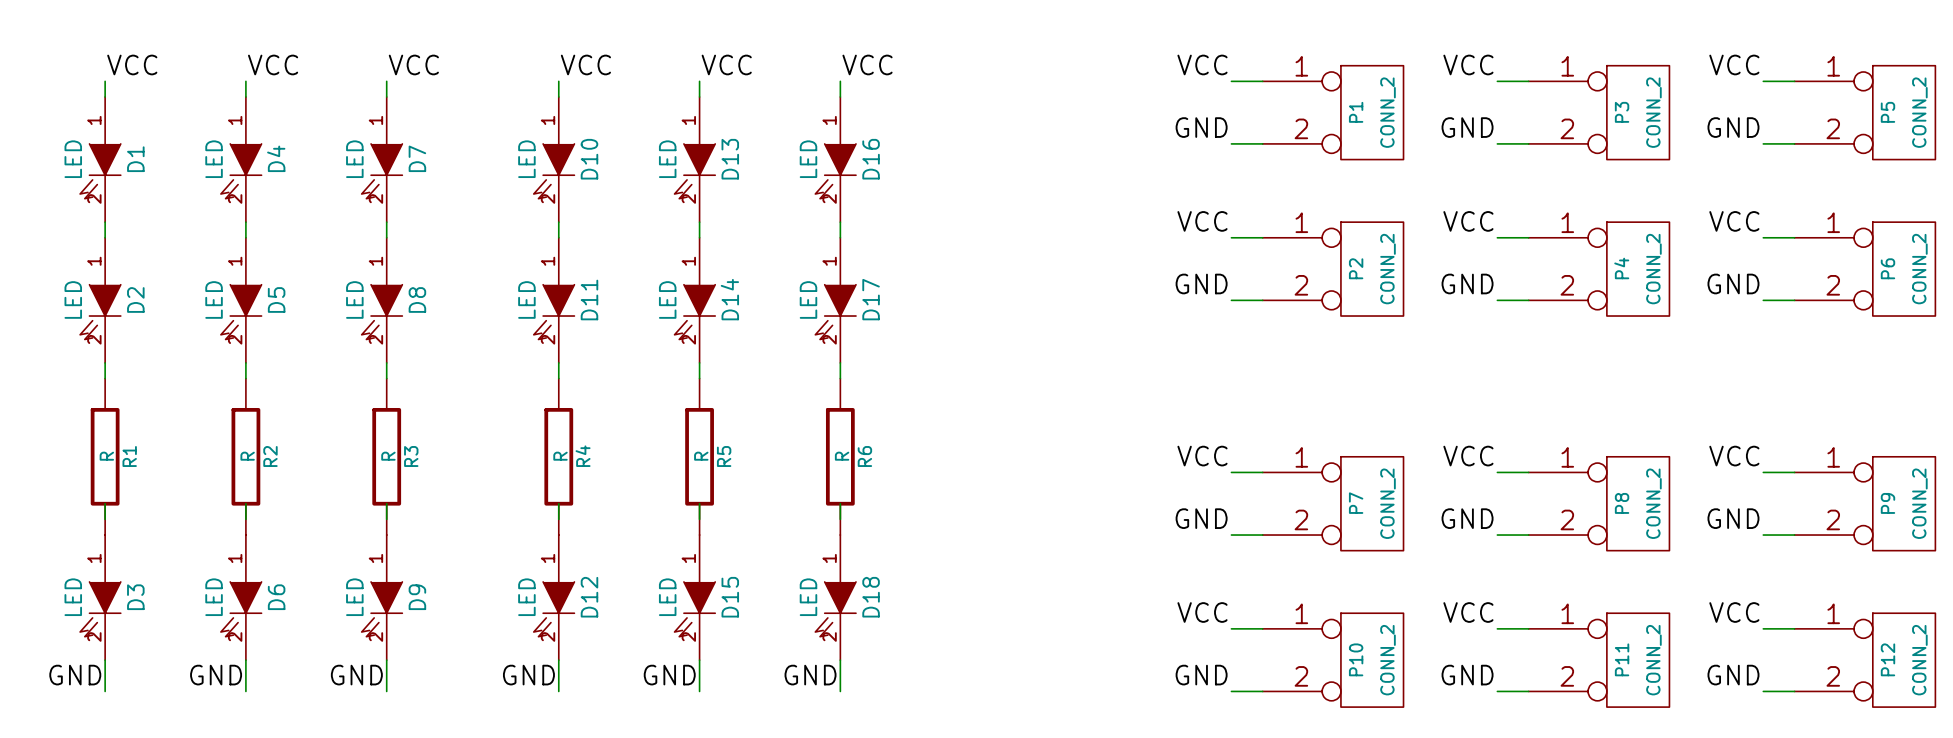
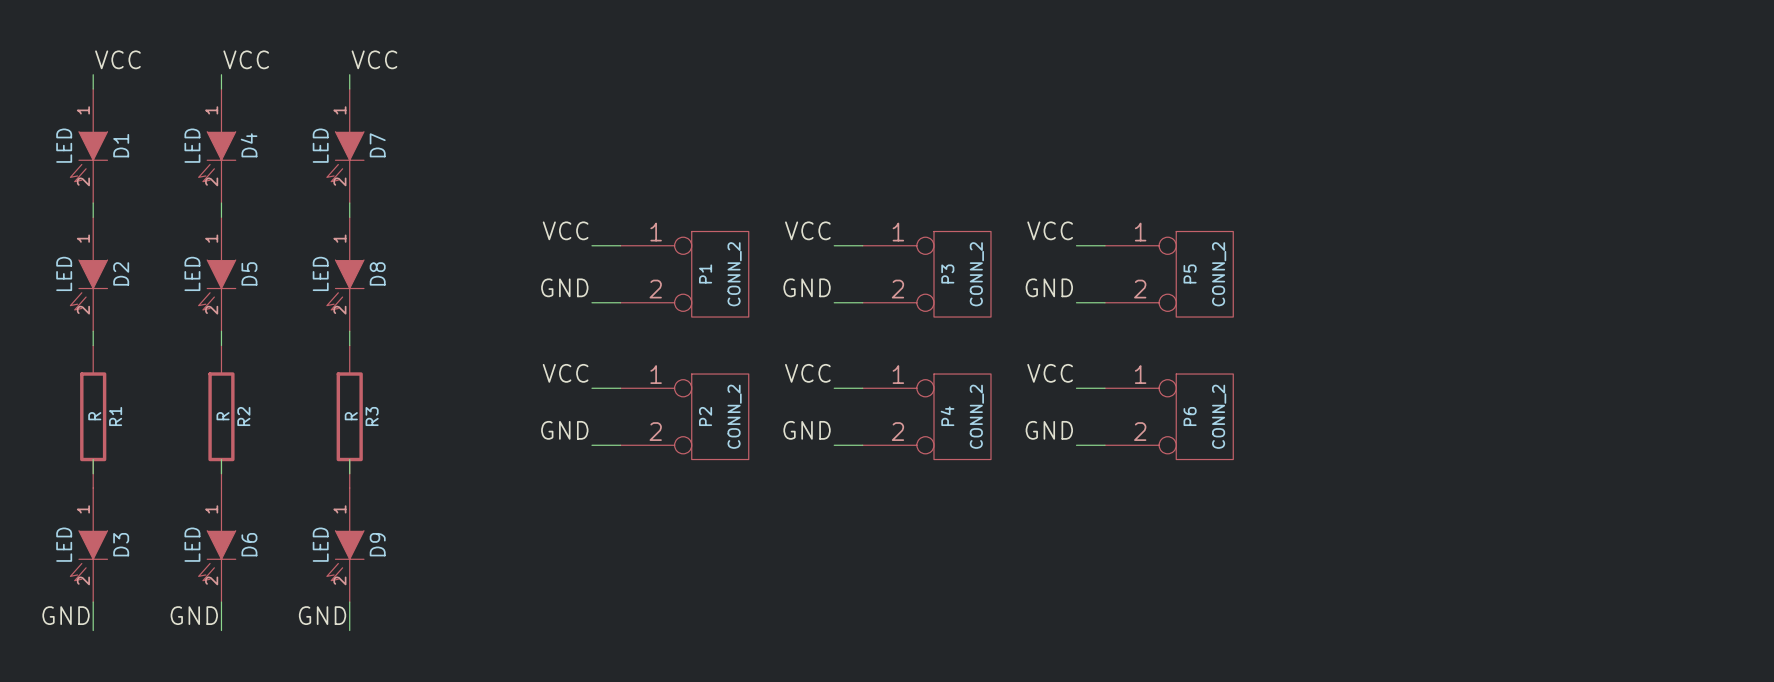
label: VCC (585, 64) -> none
label: VCC (726, 64) -> none
label: VCC (867, 64) -> none
label: VCC (1202, 64) -> none
label: VCC (1468, 64) -> none
label: VCC (1734, 64) -> none
wire: (558, 81) (558, 97) -> none
wire: (699, 81) (699, 97) -> none
wire: (840, 81) (840, 97) -> none
wire: (1231, 81) (1262, 81) -> (1076, 245) (1105, 245)
wire: (1497, 81) (1528, 81) -> none
wire: (1763, 81) (1794, 81) -> none
P1 position: (1333, 112) -> (684, 274)
P3 position: (1599, 112) -> (926, 274)
P5 position: (1864, 112) -> (1169, 274)
label: GND (1201, 127) -> none
label: GND (1467, 127) -> none
label: GND (1733, 127) -> none
wire: (1231, 143) (1262, 143) -> (1076, 302) (1105, 302)
wire: (1497, 143) (1528, 143) -> none
wire: (1763, 143) (1794, 143) -> none
D10: LED (554, 159) -> none
D13: LED (694, 159) -> none
D16: LED (835, 159) -> none
label position: VCC (1202, 221) -> VCC (1050, 230)
label: VCC (1468, 221) -> none
label: VCC (1734, 221) -> none
wire: (558, 222) (558, 237) -> none
wire: (699, 222) (699, 237) -> none
wire: (840, 222) (840, 237) -> none
wire: (1231, 237) (1262, 237) -> (1076, 388) (1105, 388)
wire: (1497, 237) (1528, 237) -> none
wire: (1763, 237) (1794, 237) -> none
label: none -> VCC (565, 230)
label: none -> VCC (807, 230)
wire: none -> (591, 245) (620, 245)
wire: none -> (834, 245) (862, 245)
P2 position: (1333, 269) -> (684, 416)
P4 position: (1599, 269) -> (926, 416)
P6 position: (1864, 269) -> (1169, 416)
label position: GND (1201, 283) -> GND (1049, 287)
label: GND (1467, 283) -> none
label: GND (1733, 283) -> none
D11: LED (554, 300) -> none
D14: LED (694, 300) -> none
D17: LED (835, 300) -> none
wire: (1231, 300) (1262, 300) -> (1076, 445) (1105, 445)
wire: (1497, 300) (1528, 300) -> none
wire: (1763, 300) (1794, 300) -> none
label: none -> GND (564, 287)
label: none -> GND (807, 287)
wire: none -> (591, 302) (620, 302)
wire: none -> (834, 302) (862, 302)
wire: (558, 362) (558, 378) -> none
wire: (699, 362) (699, 378) -> none
wire: (840, 362) (840, 378) -> none
label: none -> VCC (565, 373)
label: none -> VCC (807, 373)
wire: none -> (591, 388) (620, 388)
wire: none -> (834, 388) (862, 388)
R4: R (558, 456) -> none
R5: R (699, 456) -> none
R6: R (840, 456) -> none
label position: VCC (1202, 456) -> VCC (1050, 373)
label: VCC (1468, 456) -> none
label: VCC (1734, 456) -> none
label: none -> GND (564, 430)
label: none -> GND (807, 430)
wire: (1231, 472) (1262, 472) -> none
wire: (1497, 472) (1528, 472) -> none
wire: (1763, 472) (1794, 472) -> none
wire: none -> (591, 445) (620, 445)
wire: none -> (834, 445) (862, 445)
wire: (558, 503) (558, 519) -> none
wire: (699, 503) (699, 519) -> none
wire: (840, 503) (840, 519) -> none
P7: CONN_2 (1333, 503) -> none
P8: CONN_2 (1599, 503) -> none
P9: CONN_2 (1864, 503) -> none
label position: GND (1201, 518) -> GND (1049, 430)
label: GND (1467, 518) -> none
label: GND (1733, 518) -> none
wire: (1231, 535) (1262, 535) -> none
wire: (1497, 535) (1528, 535) -> none
wire: (1763, 535) (1794, 535) -> none
D12: LED (554, 597) -> none
D15: LED (694, 597) -> none
D18: LED (835, 597) -> none
label: VCC (1202, 612) -> none
label: VCC (1468, 612) -> none
label: VCC (1734, 612) -> none
wire: (1231, 628) (1262, 628) -> none
wire: (1497, 628) (1528, 628) -> none
wire: (1763, 628) (1794, 628) -> none
wire: (558, 660) (558, 691) -> none
wire: (699, 660) (699, 691) -> none
wire: (840, 660) (840, 691) -> none
P10: CONN_2 (1333, 660) -> none
P11: CONN_2 (1599, 660) -> none
P12: CONN_2 (1864, 660) -> none
label: GND (528, 675) -> none
label: GND (669, 675) -> none
label: GND (810, 675) -> none
label: GND (1201, 675) -> none
label: GND (1467, 675) -> none
label: GND (1733, 675) -> none
wire: (1231, 691) (1262, 691) -> none
wire: (1497, 691) (1528, 691) -> none
wire: (1763, 691) (1794, 691) -> none

